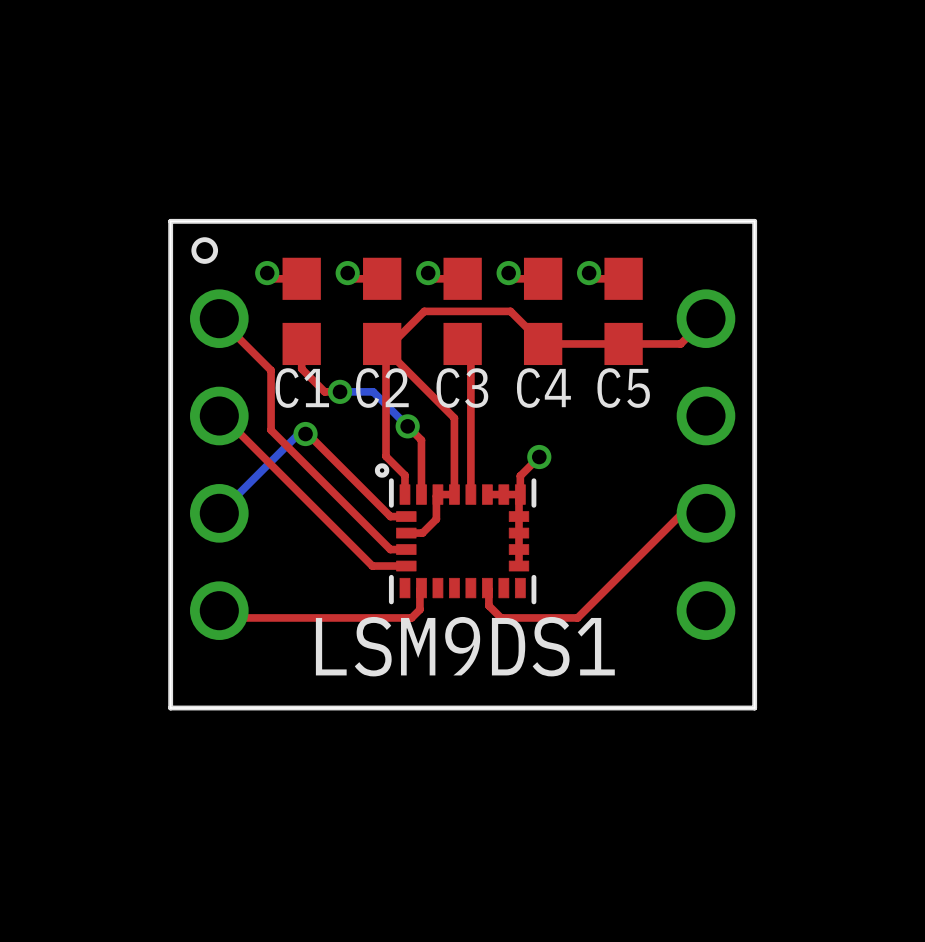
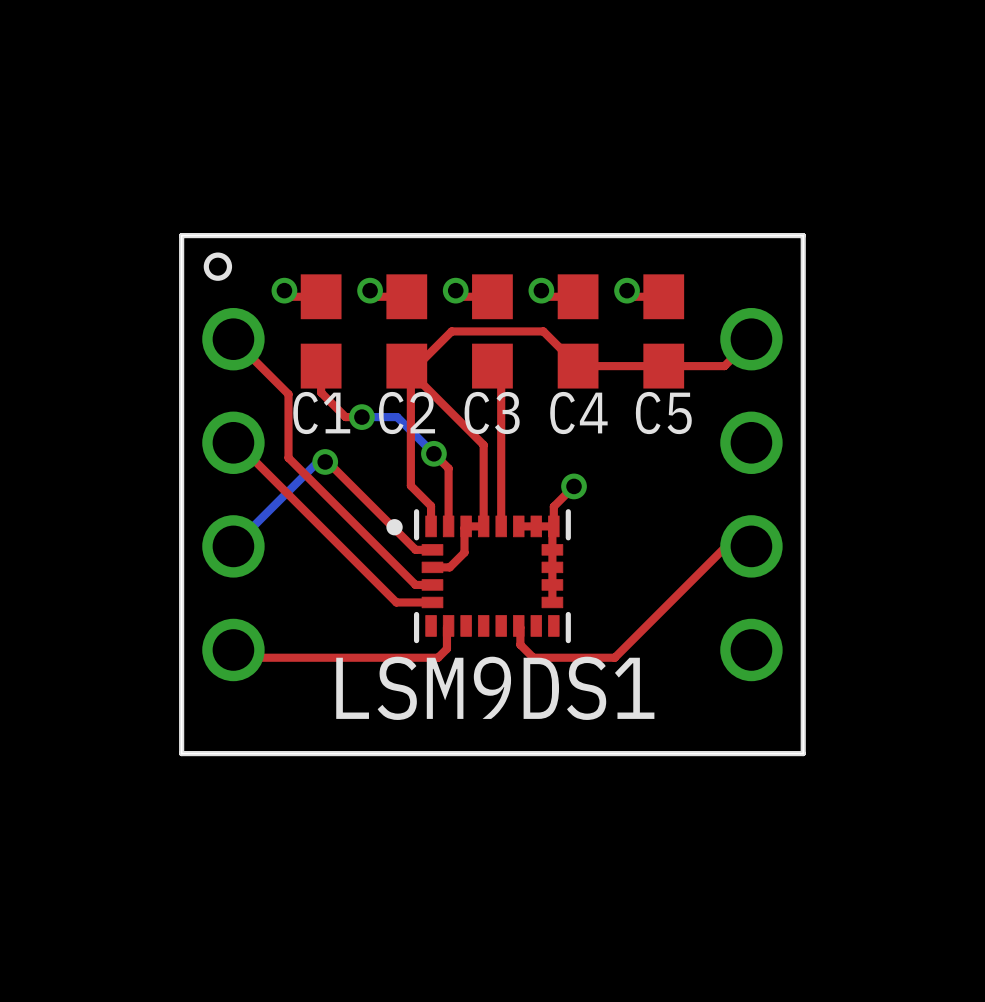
part footprint: [374, 463, 537, 605] -> [386, 509, 571, 644]

